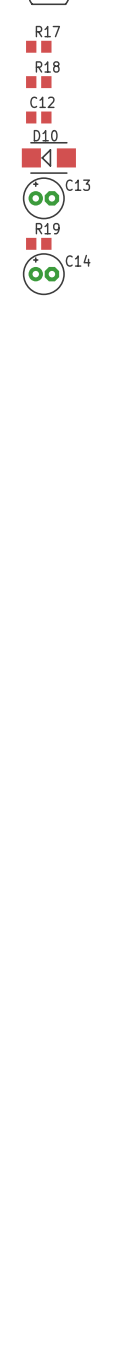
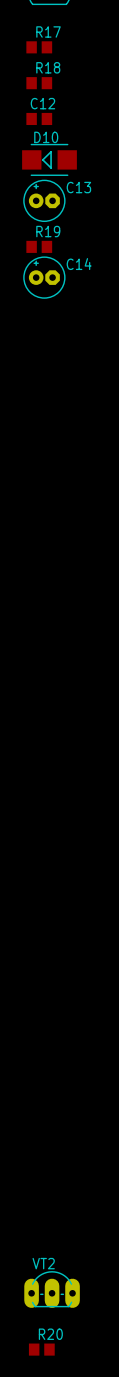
VT2: none -> (52, 1289)
R20: none -> (41, 1349)

